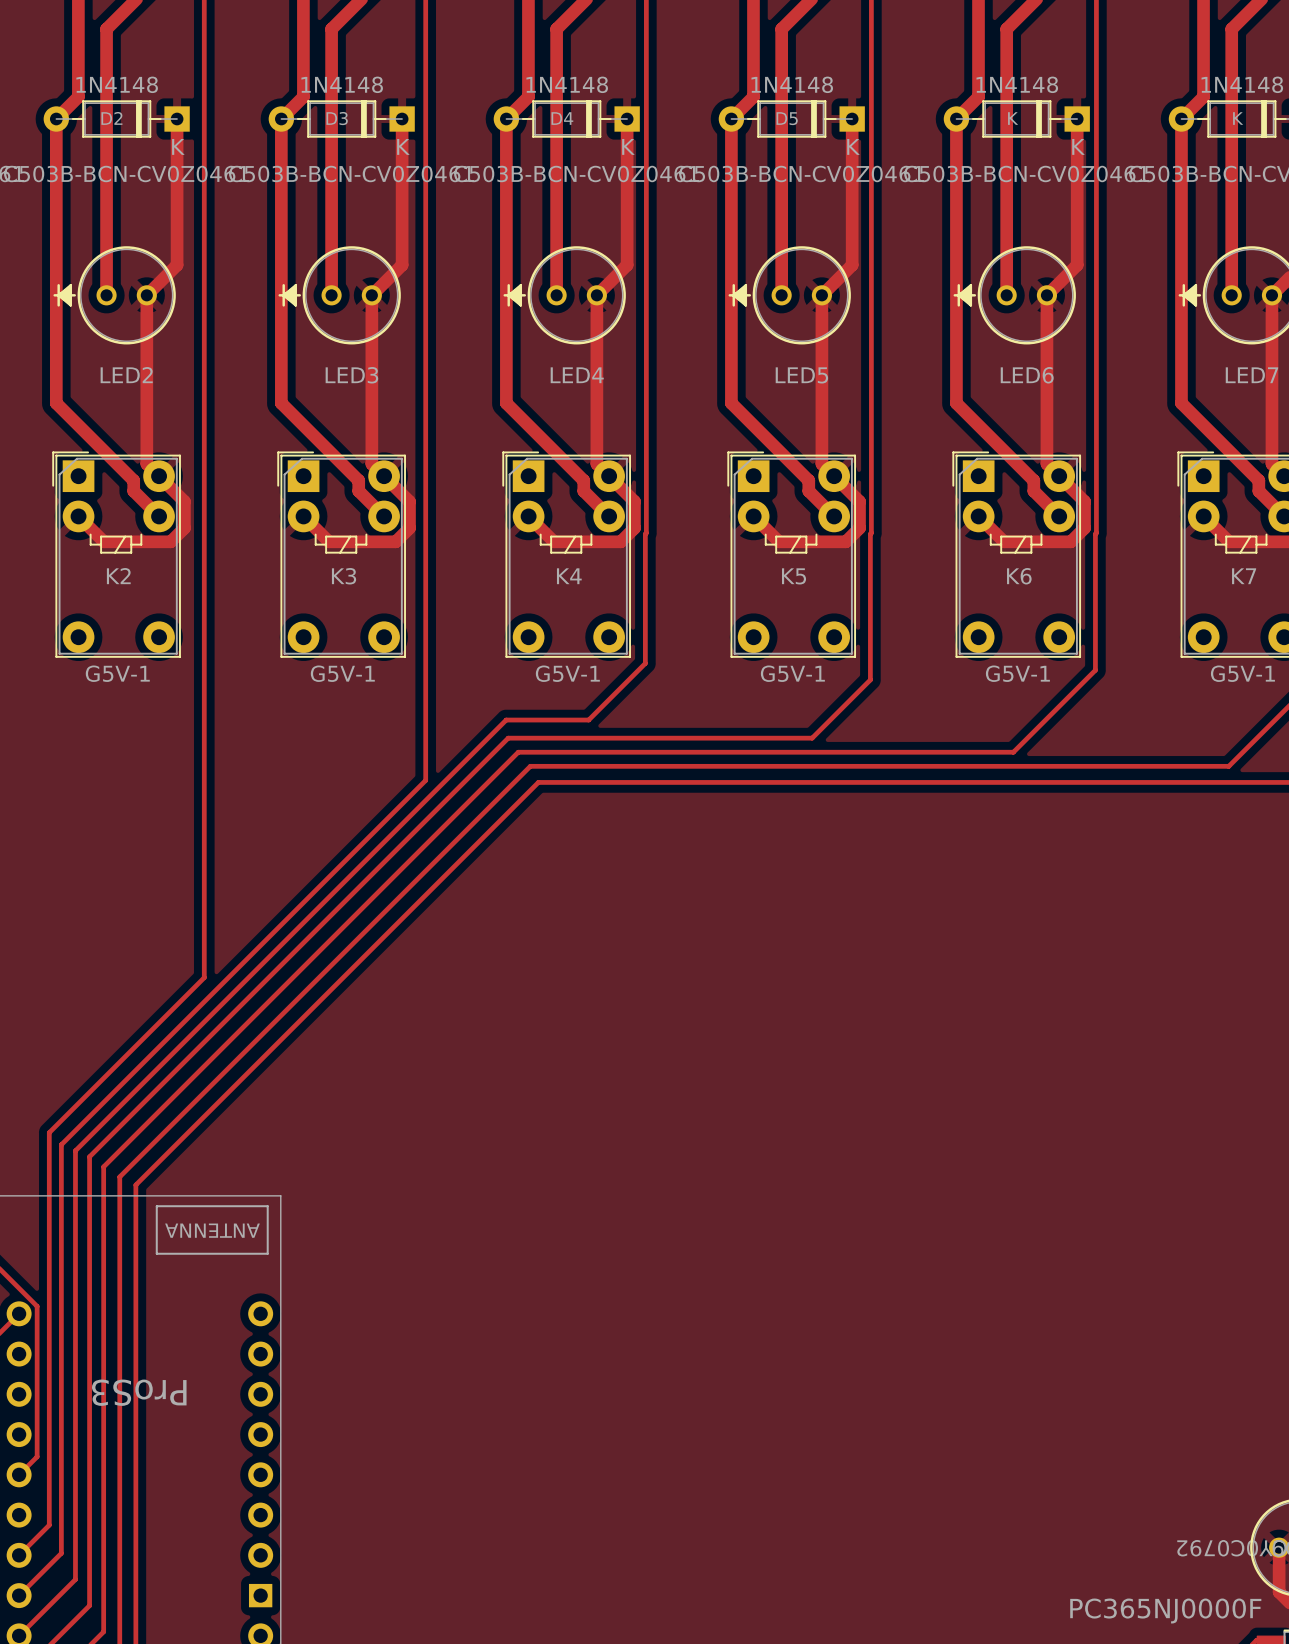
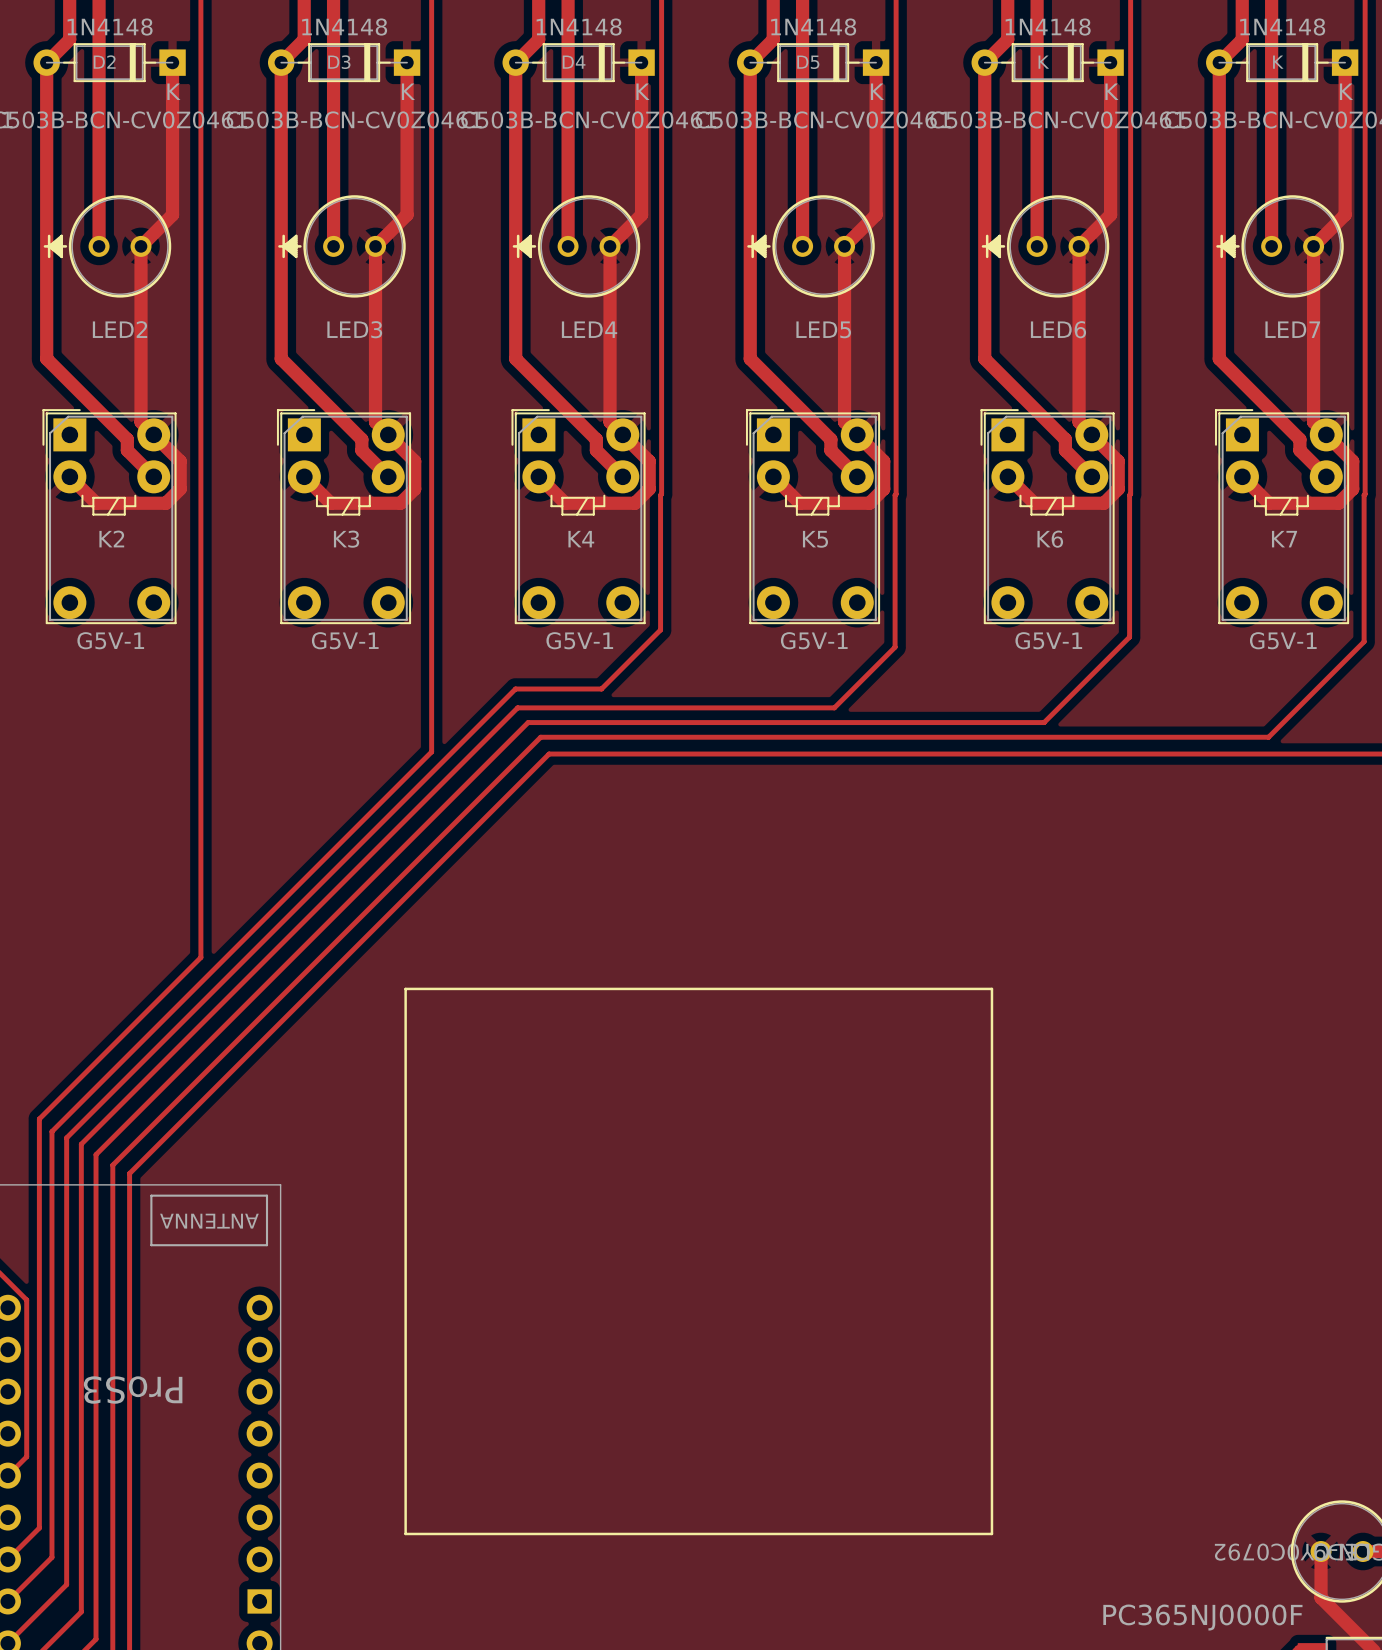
line: none -> (405, 988) (991, 988) (991, 1533) (405, 1533) (405, 988)

